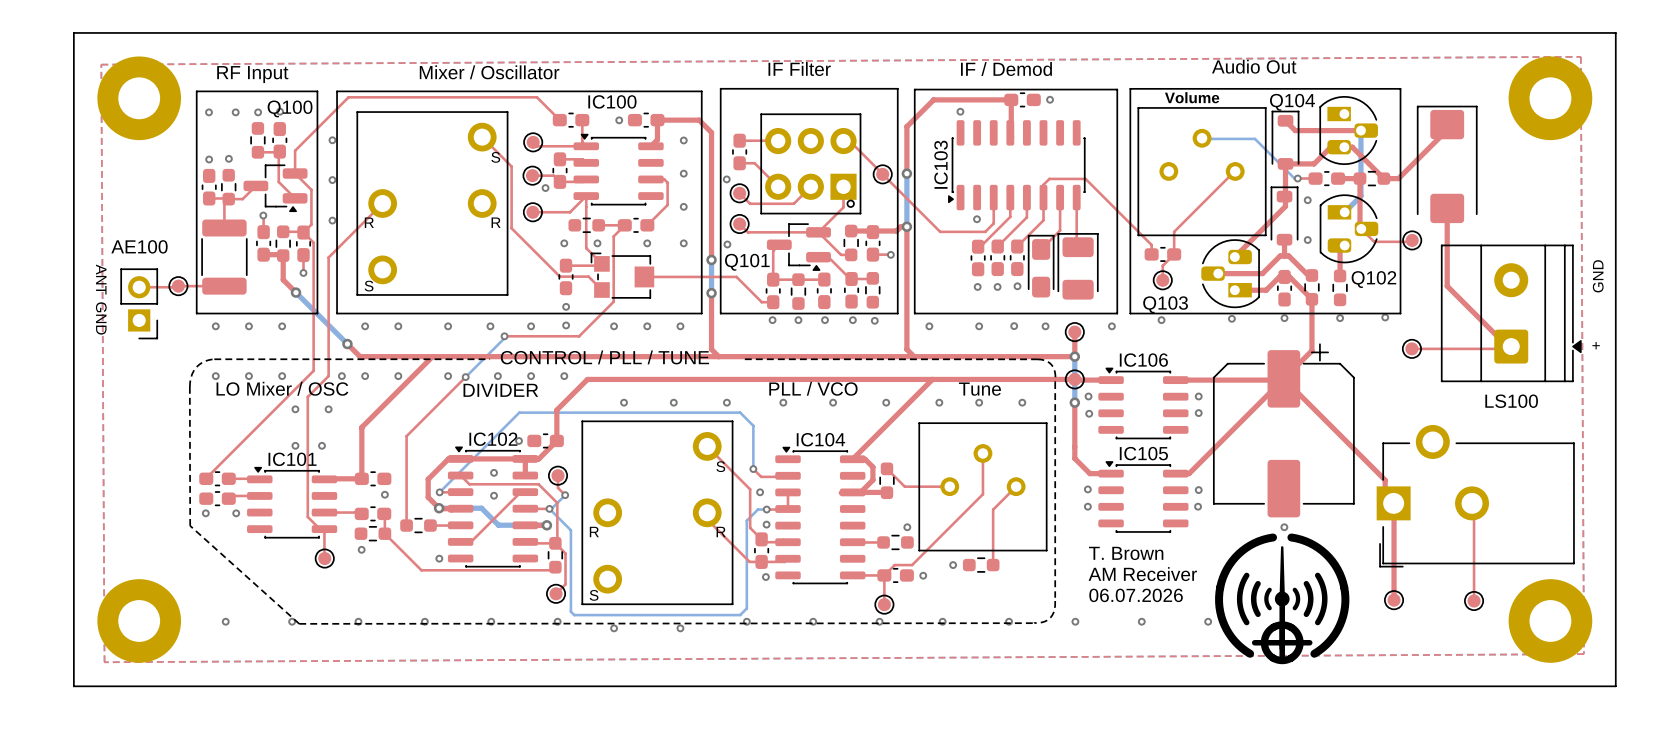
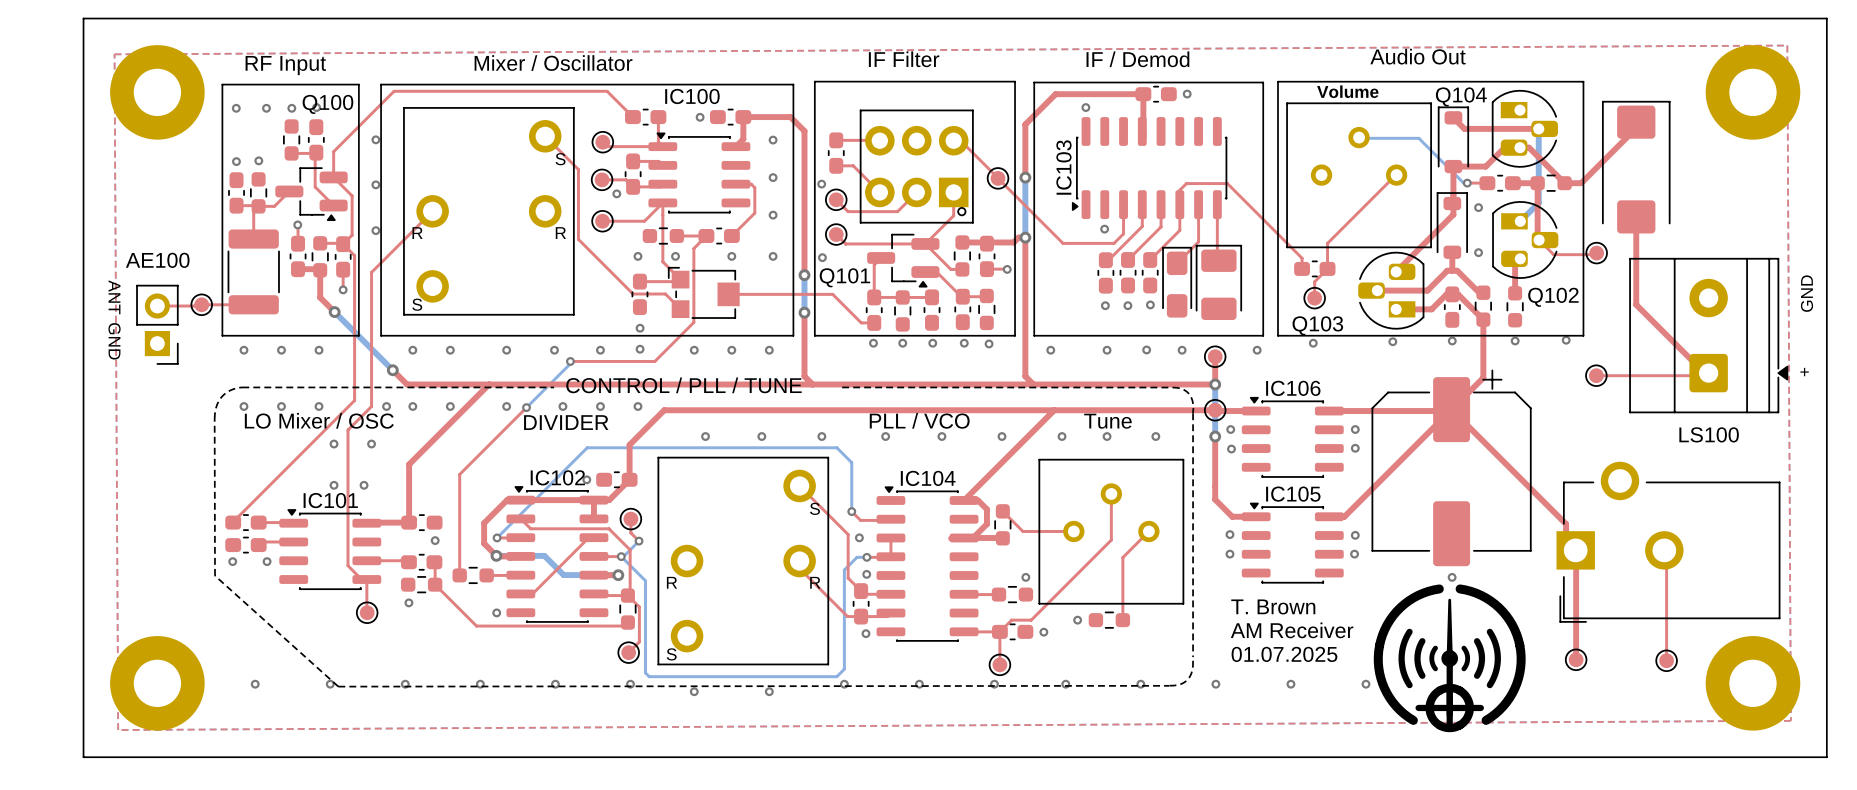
via: (494, 472) -> none
via: (494, 495) -> none
text: 06.07.2026 (1136, 595) -> 01.07.2025 (1284, 654)

